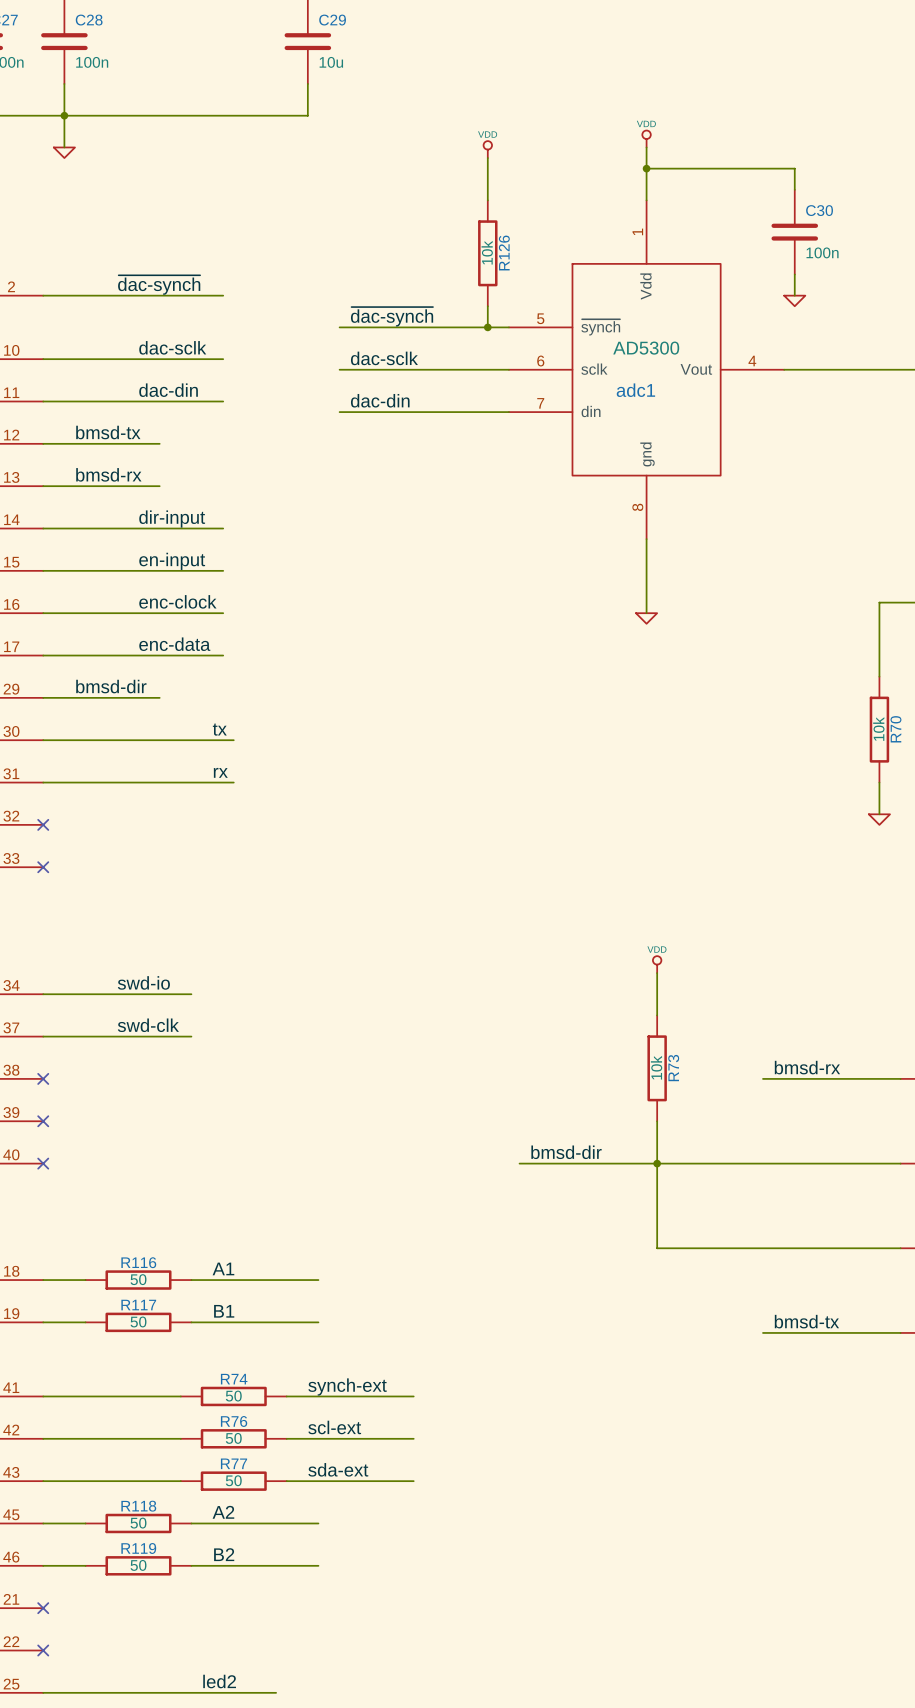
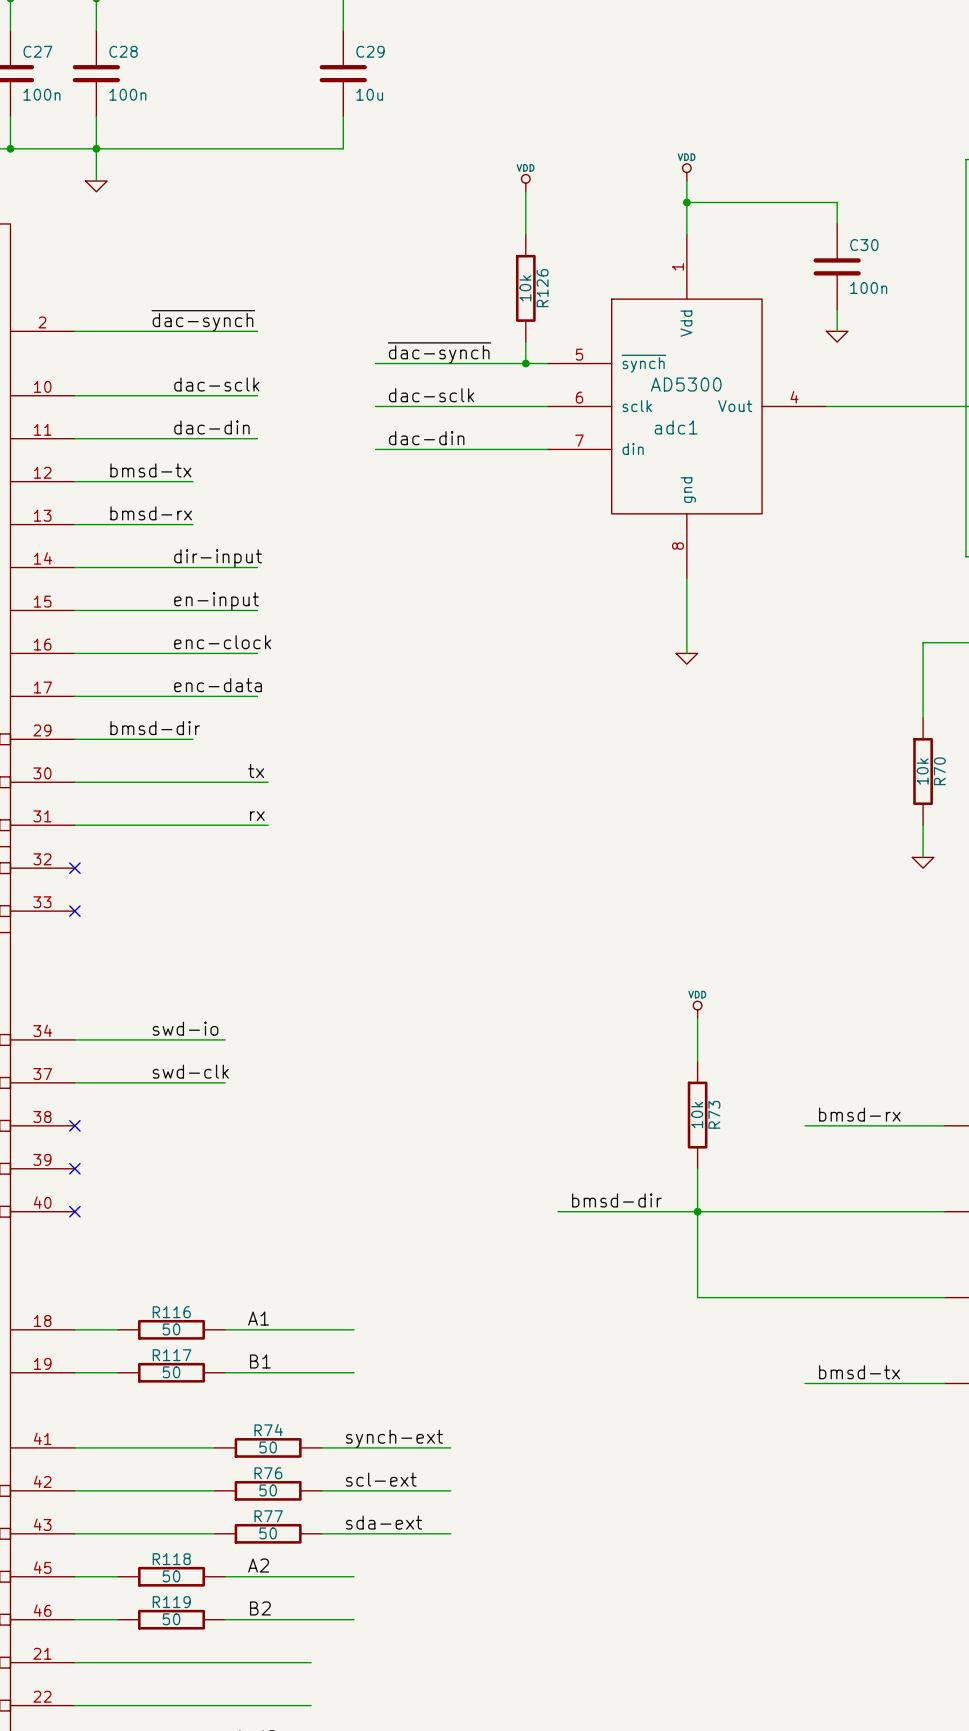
wire: none -> (74, 1662) (311, 1662)
no-connect mark: (43, 1608) -> none
wire: none -> (74, 1705) (311, 1705)
no-connect mark: (43, 1650) -> none

